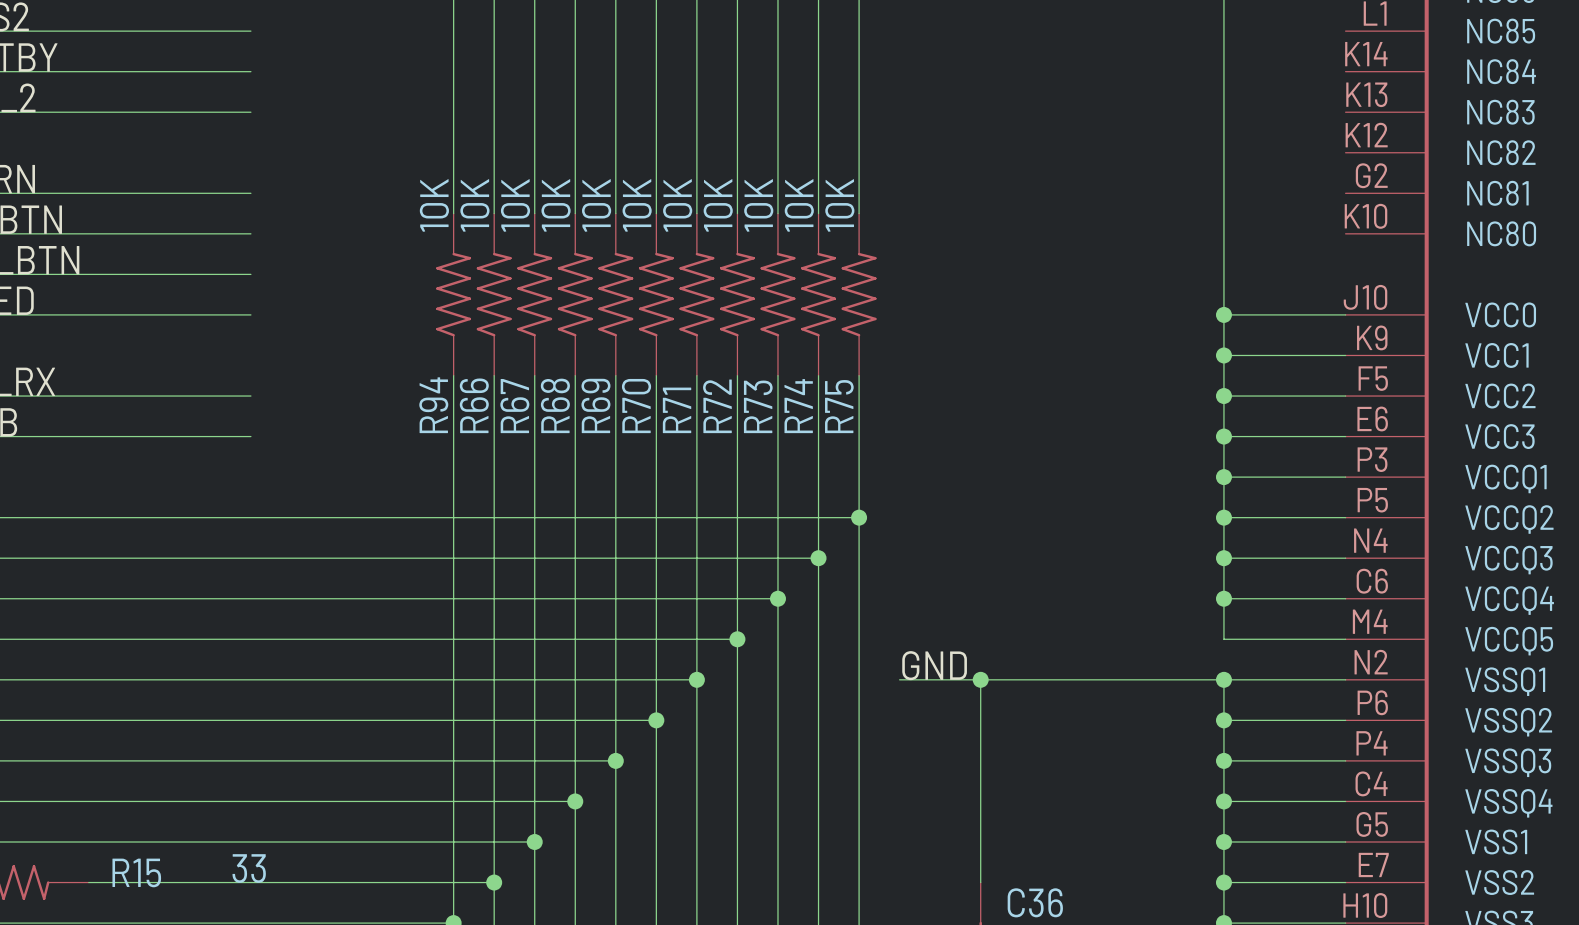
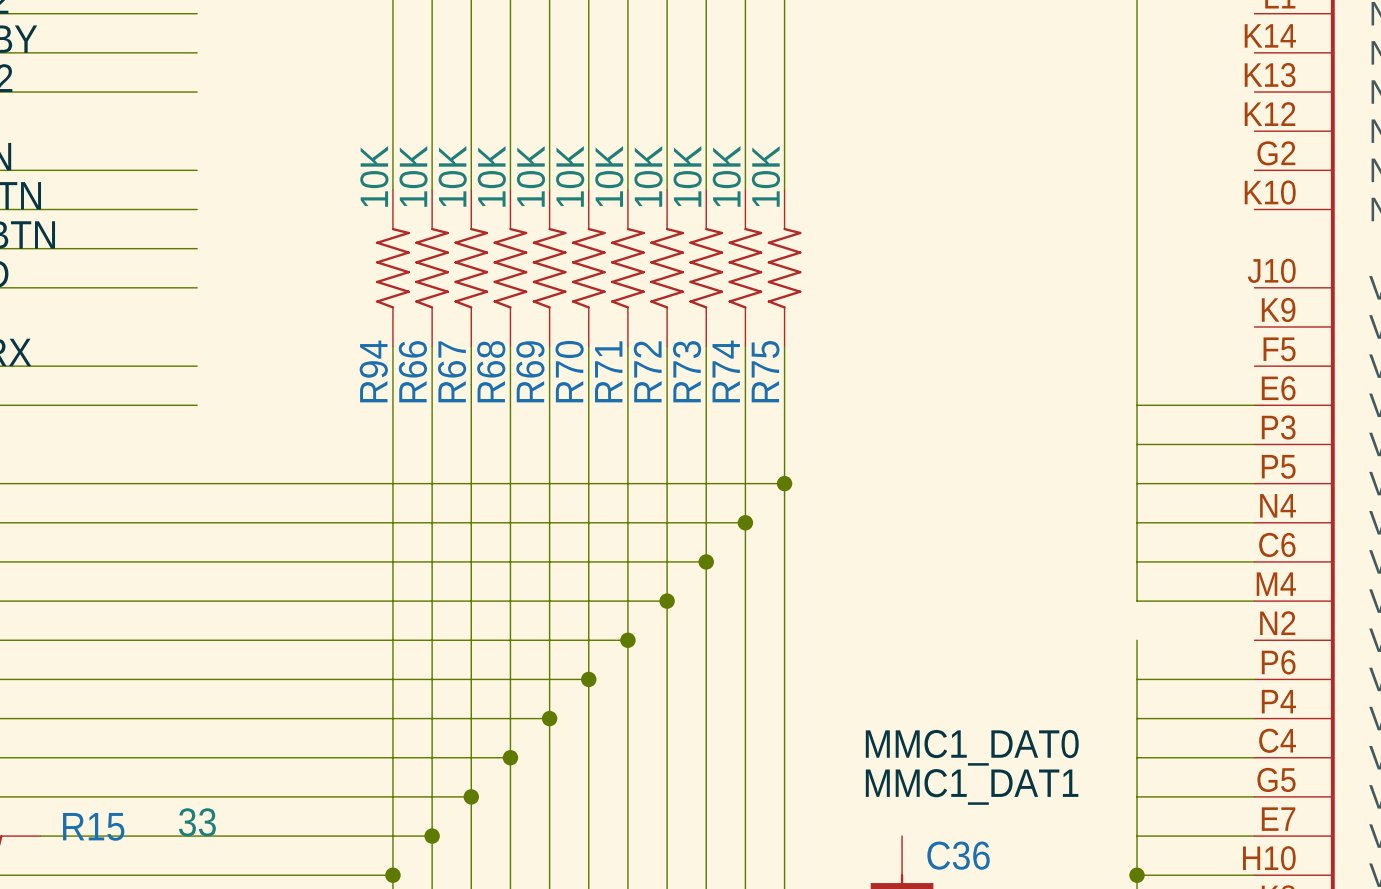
wire: (1223, 314) (1345, 314) -> none
junction: (1223, 314) -> none
wire: (1223, 355) (1345, 355) -> none
junction: (1223, 355) -> none
wire: (1223, 396) (1345, 396) -> none
junction: (1223, 396) -> none
junction: (1223, 436) -> none
junction: (1223, 477) -> none
junction: (1223, 517) -> none
junction: (1223, 558) -> none
junction: (1223, 598) -> none
label: GND (934, 665) -> none
wire: (899, 679) (1345, 679) -> none
wire: (980, 679) (980, 882) -> none
junction: (980, 679) -> none
junction: (1223, 679) -> none
junction: (1223, 720) -> none
junction: (1223, 760) -> none
label: none -> MMC1_DAT0 (972, 747)
junction: (1223, 801) -> none
label: none -> MMC1_DAT1 (972, 786)
junction: (1223, 842) -> none
junction: (1223, 882) -> none

